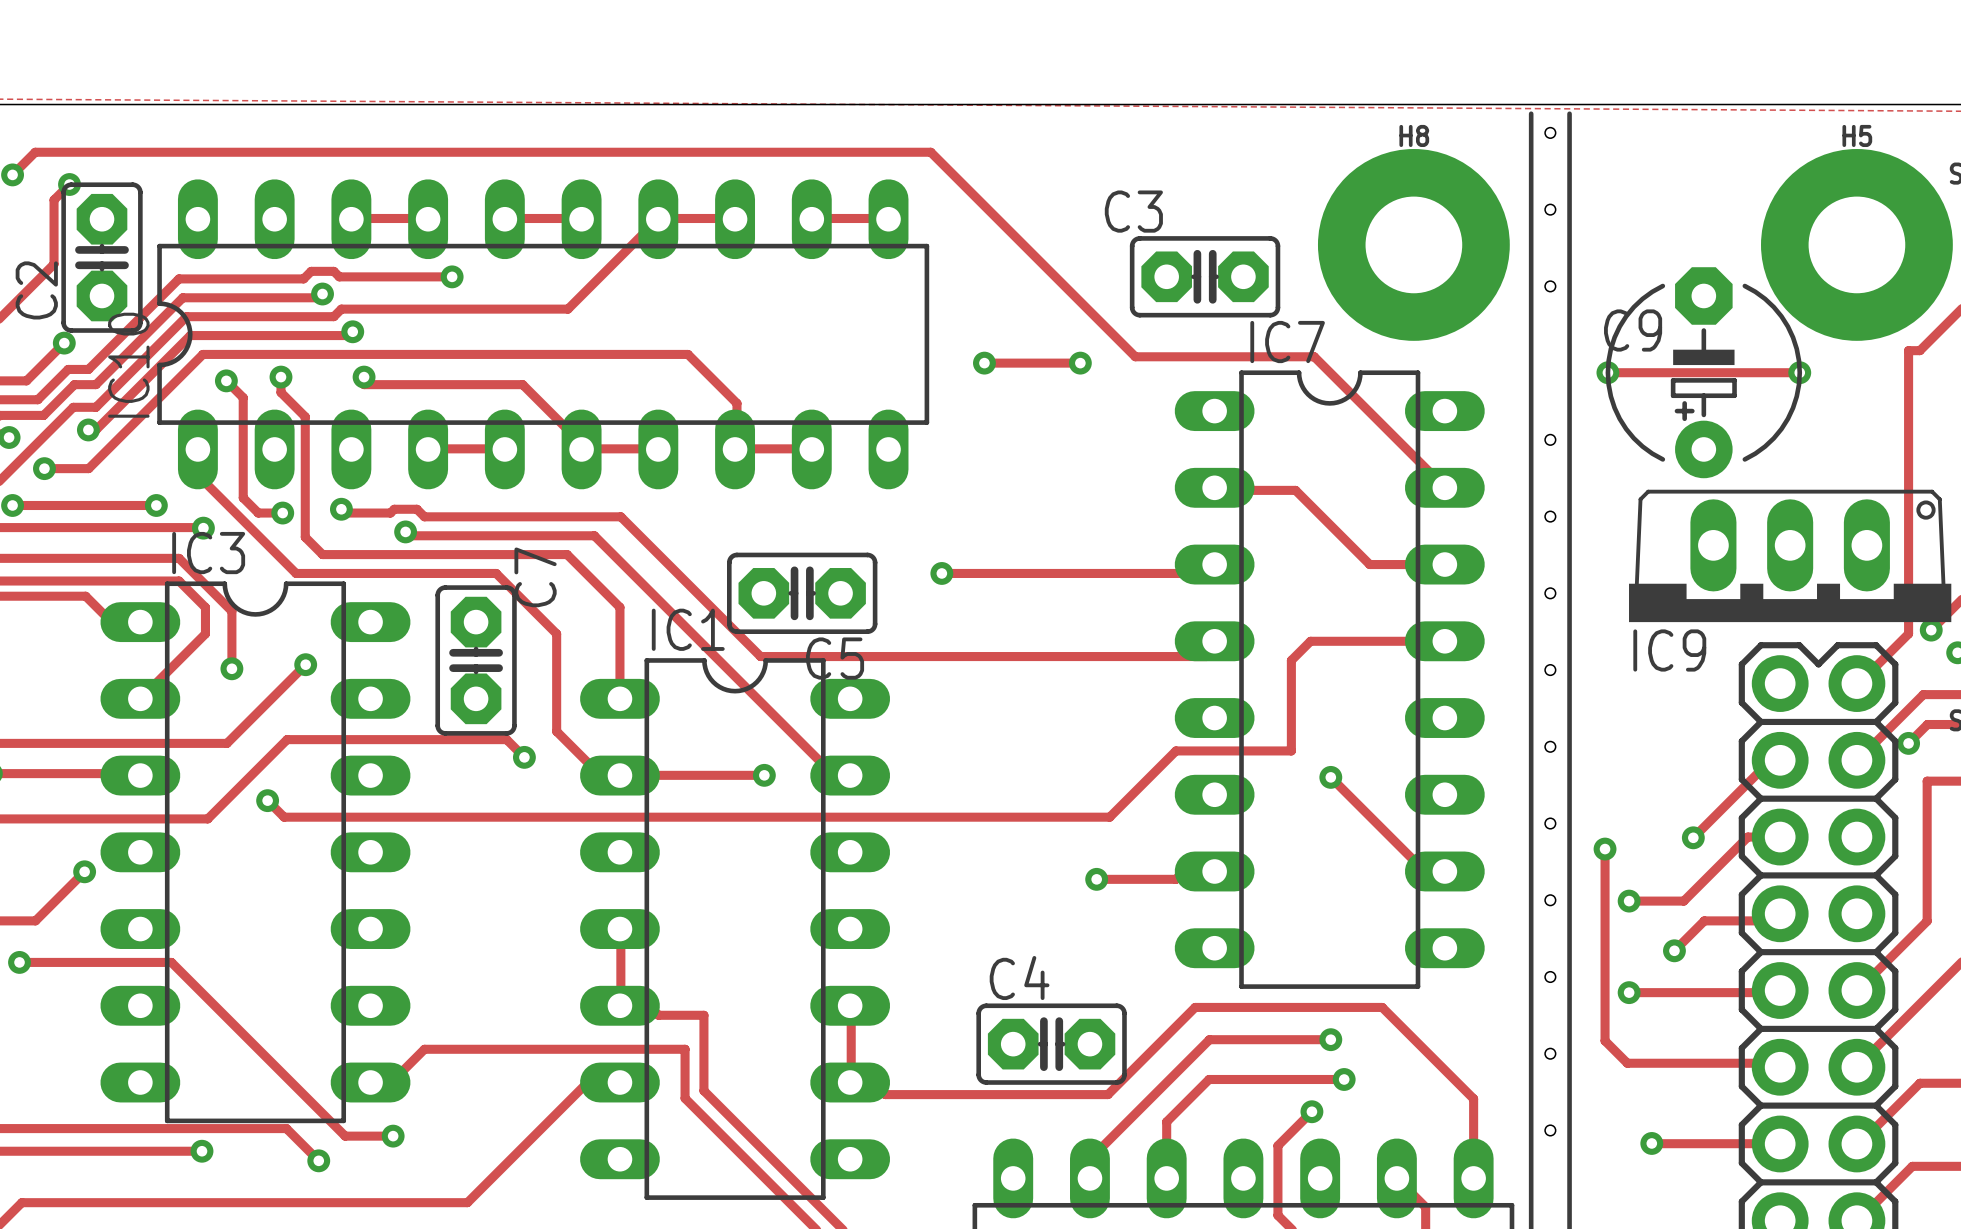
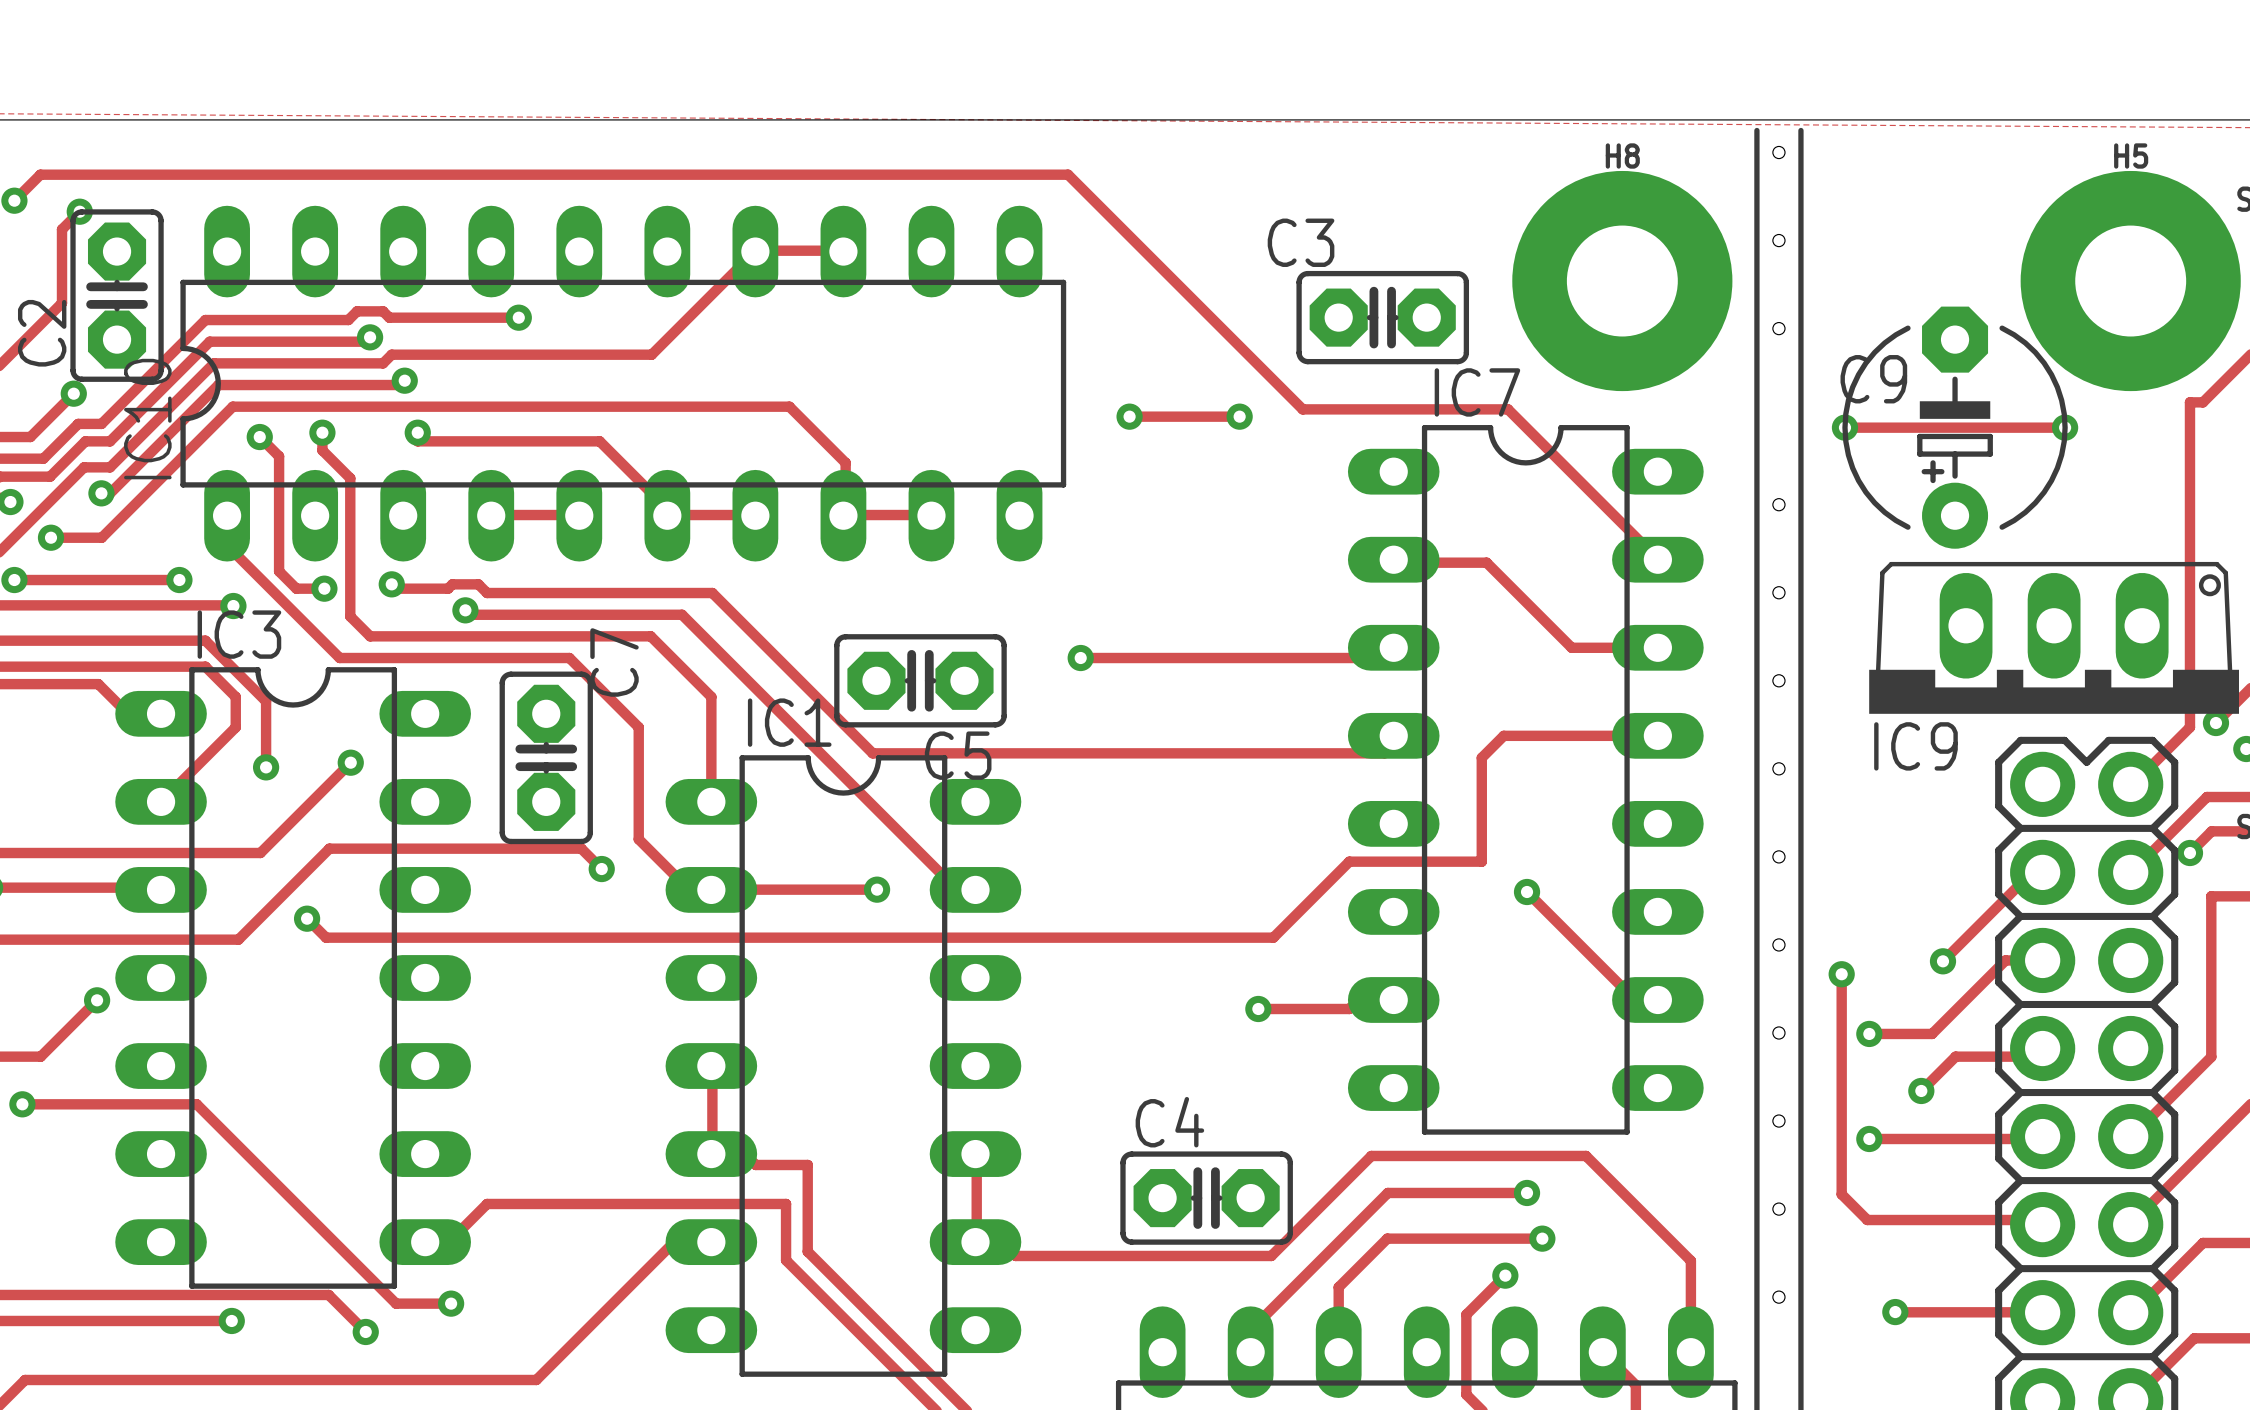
track: (351, 219) (428, 219) -> none
track: (504, 219) (581, 219) -> none
track: (811, 219) (888, 219) -> none

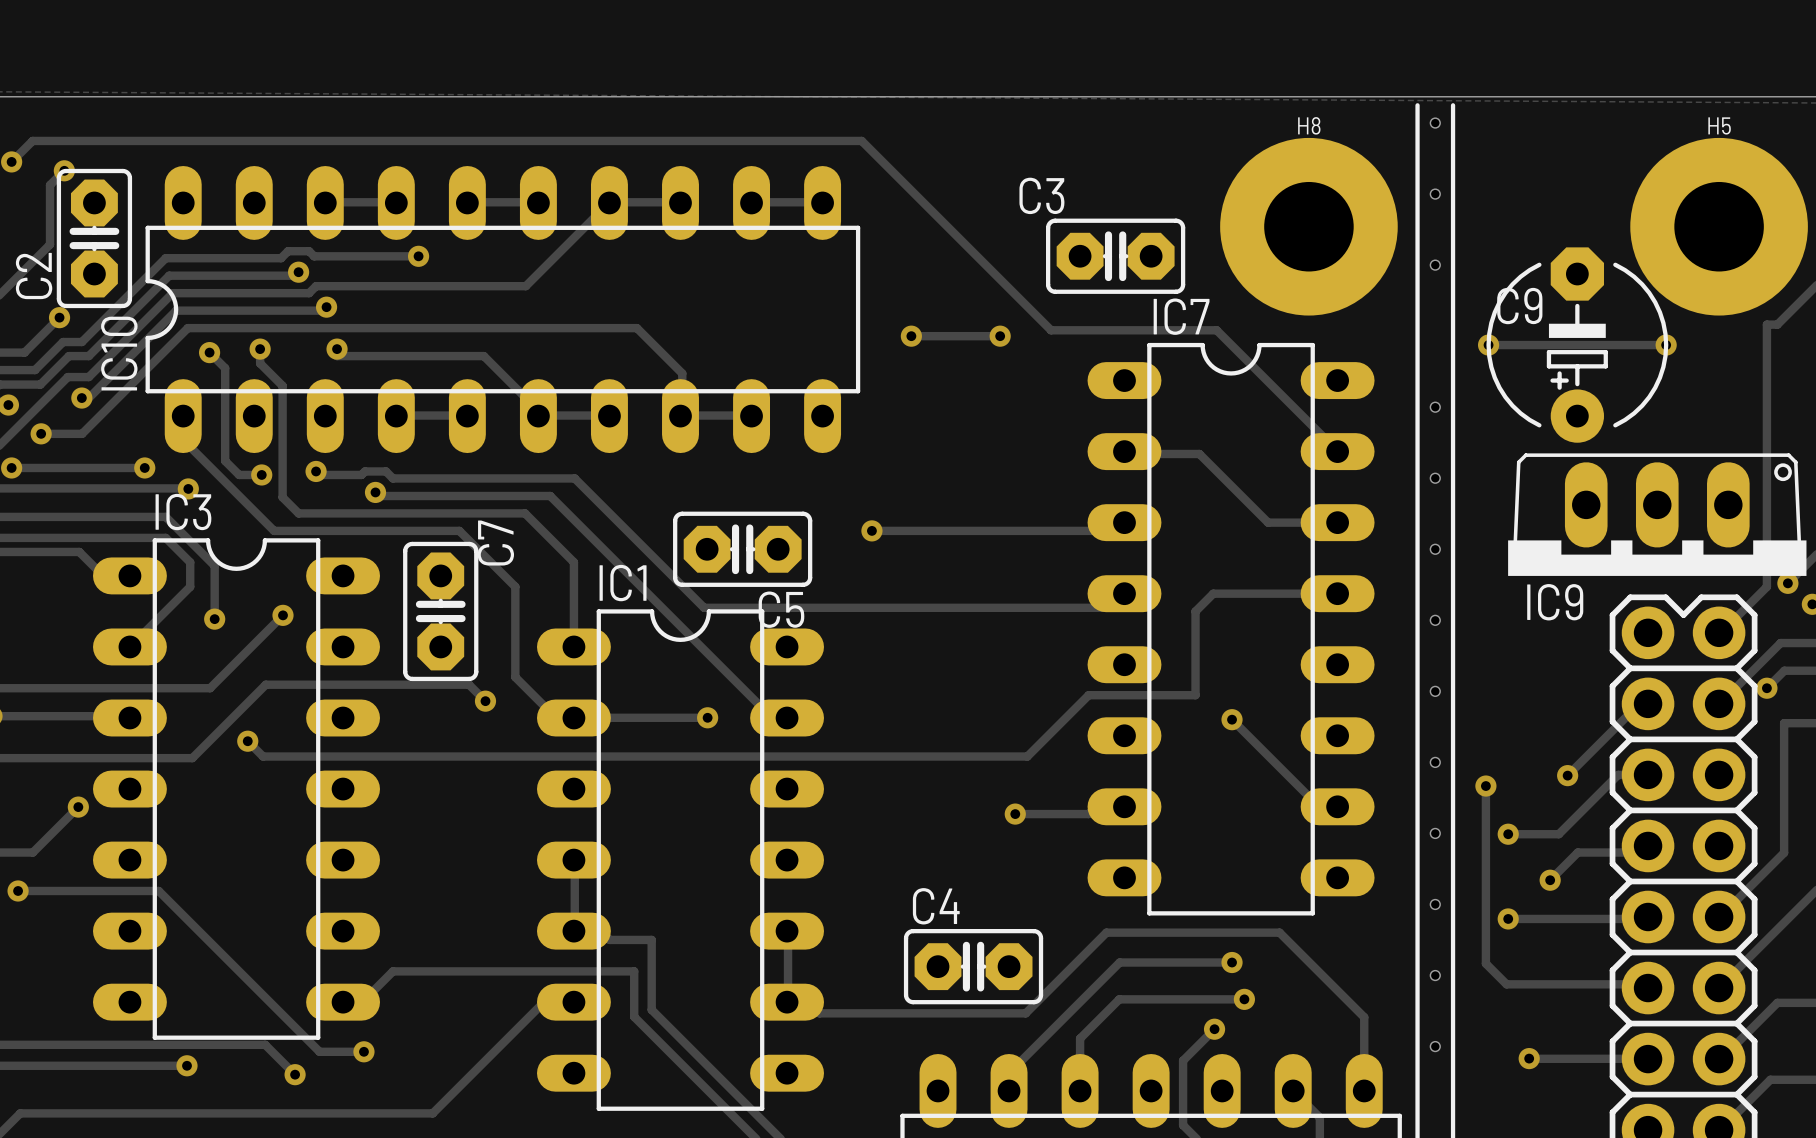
track: none -> (325, 202) (396, 202)
track: none -> (467, 202) (538, 202)
track: none -> (751, 202) (822, 202)

